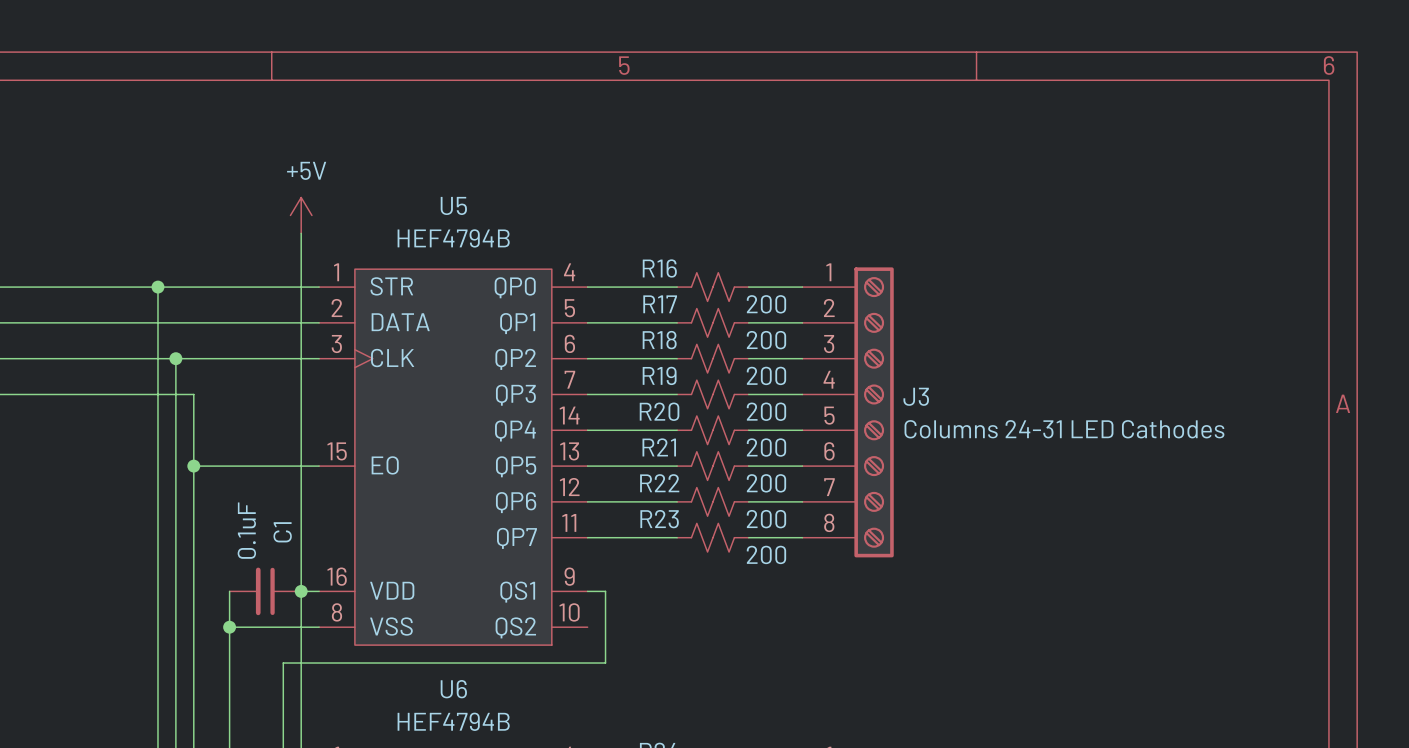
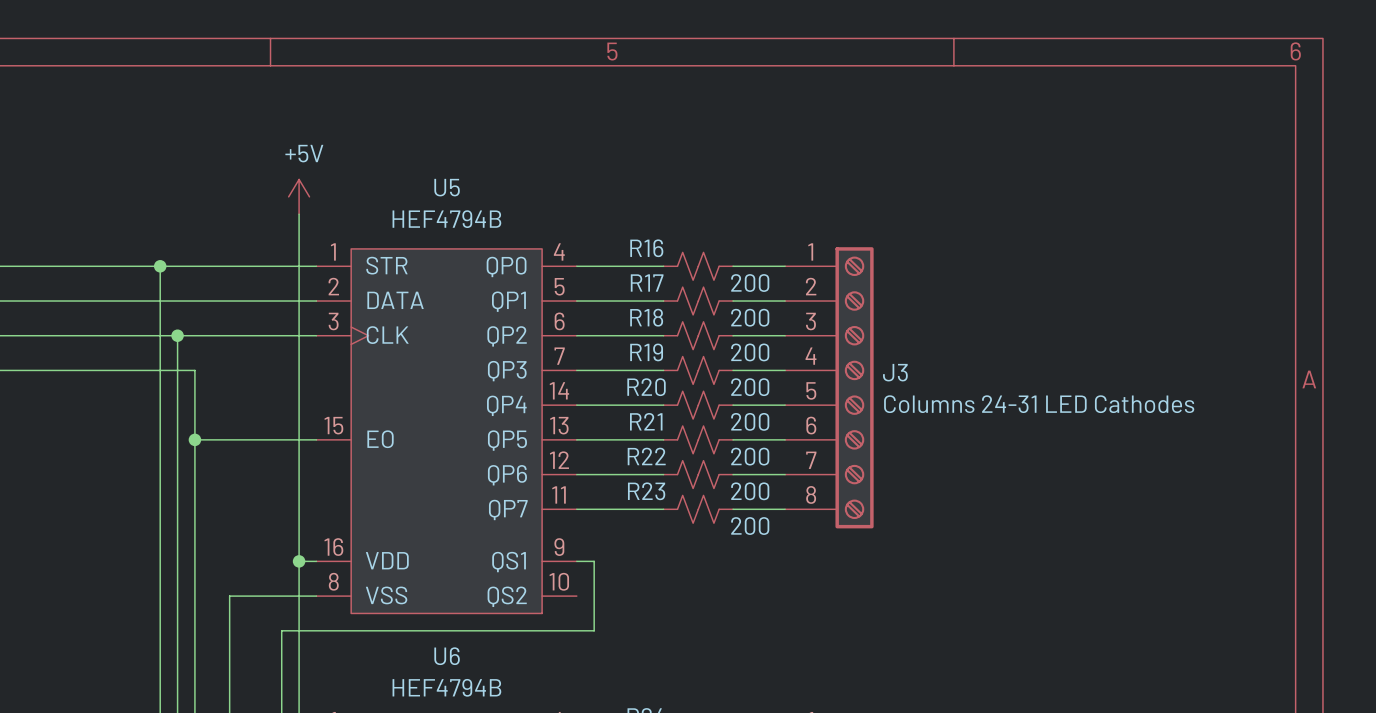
wire: (229, 591) (229, 627) -> none
C1: 0.1uF (265, 591) -> none
junction: (229, 627) -> none

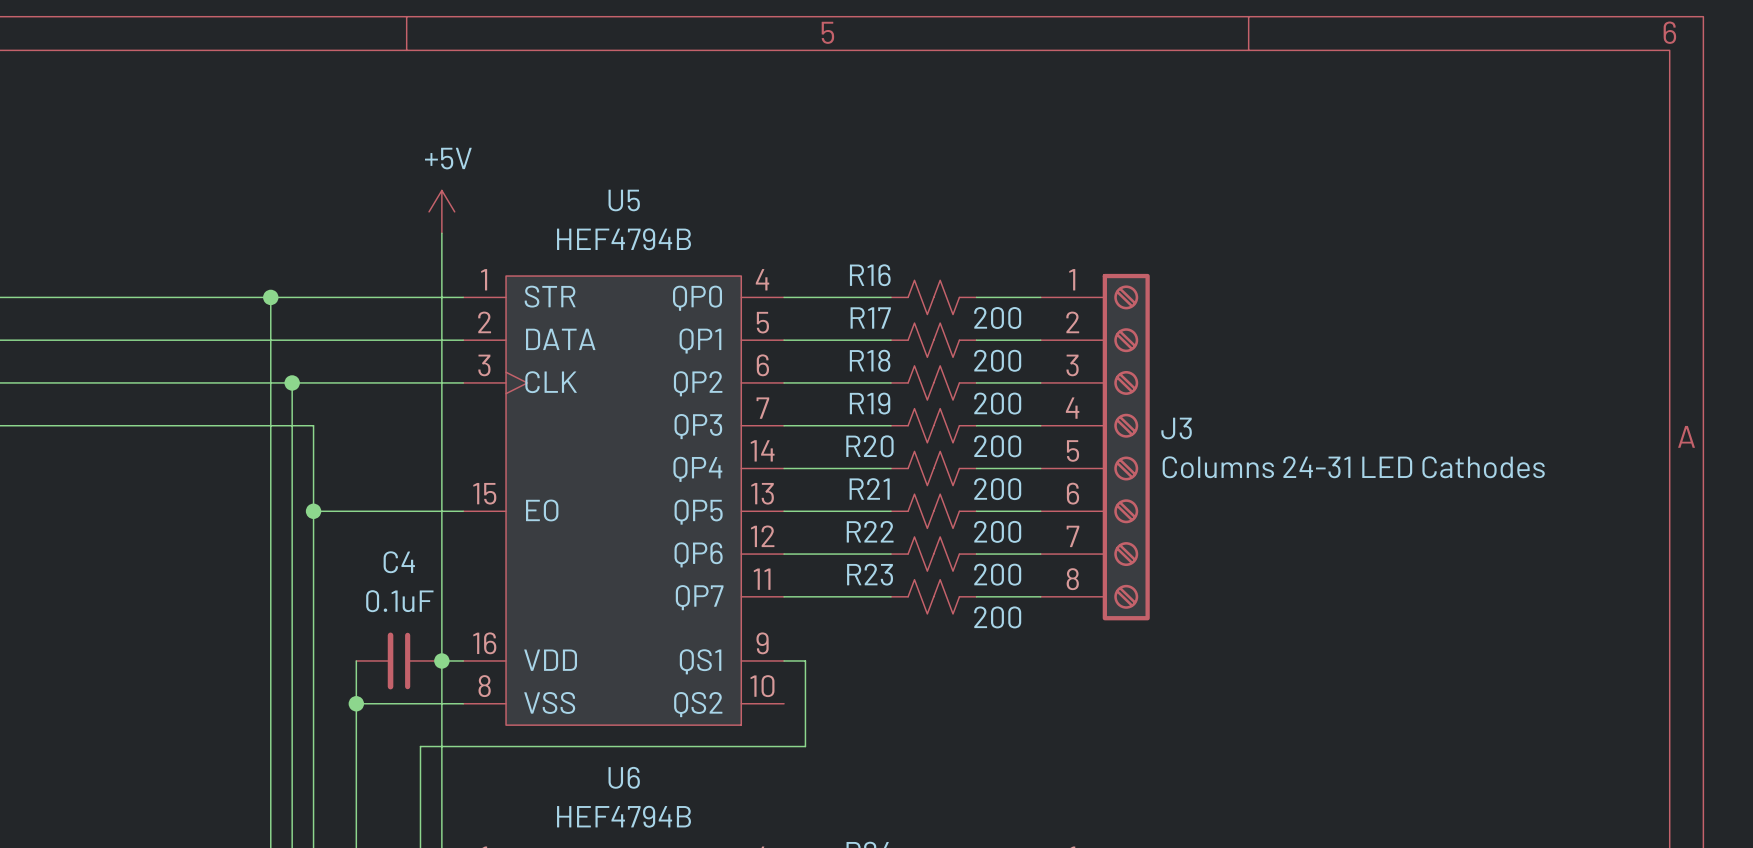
wire: none -> (356, 660) (356, 703)
C4: none -> 0.1uF (399, 660)
junction: none -> (356, 703)

